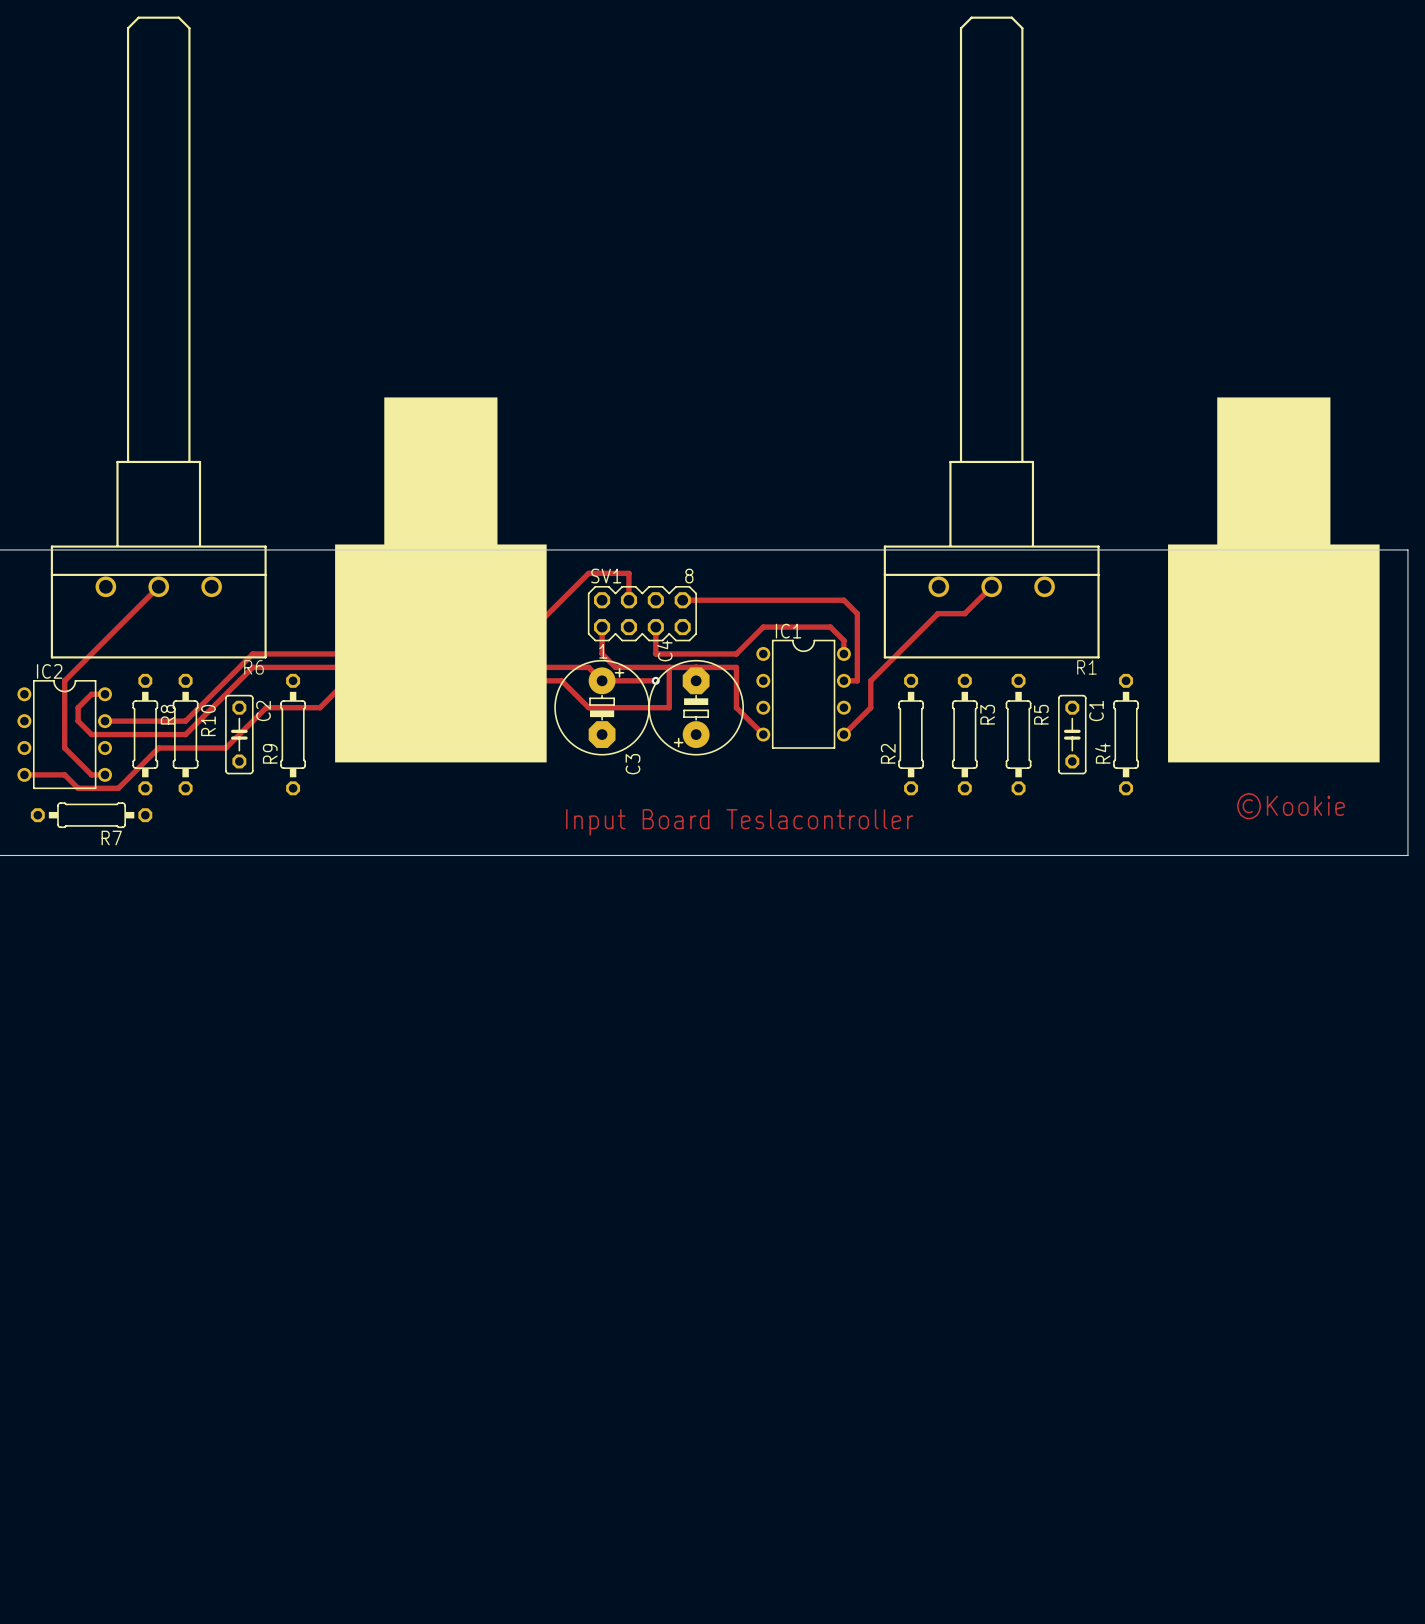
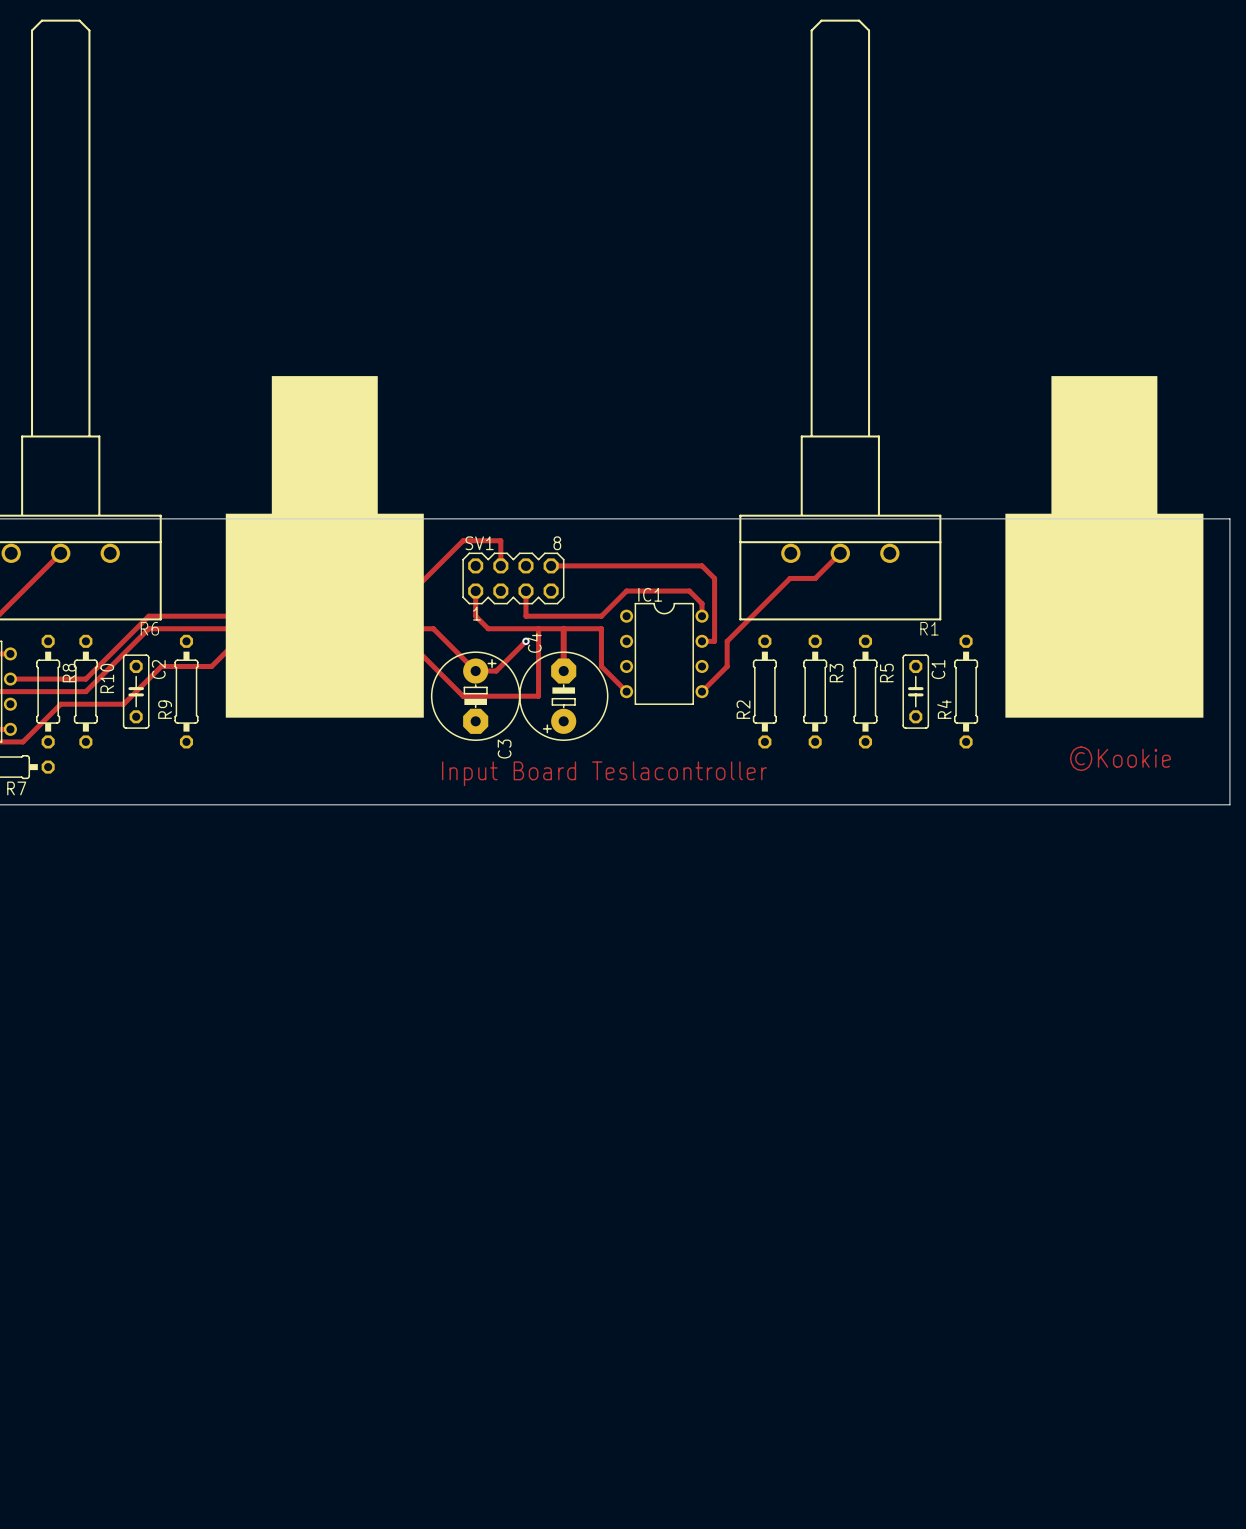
track: (556, 667) (588, 667) (602, 680) (655, 680) -> (433, 628) (475, 671) (496, 671) (525, 641)
track: (530, 680) (561, 680) (588, 707) (669, 707) -> (408, 641) (463, 696) (538, 696) (538, 666)
track: none -> (563, 641) (563, 671)
C3 position: (602, 707) -> (475, 696)
C4 position: (696, 707) -> (563, 696)

